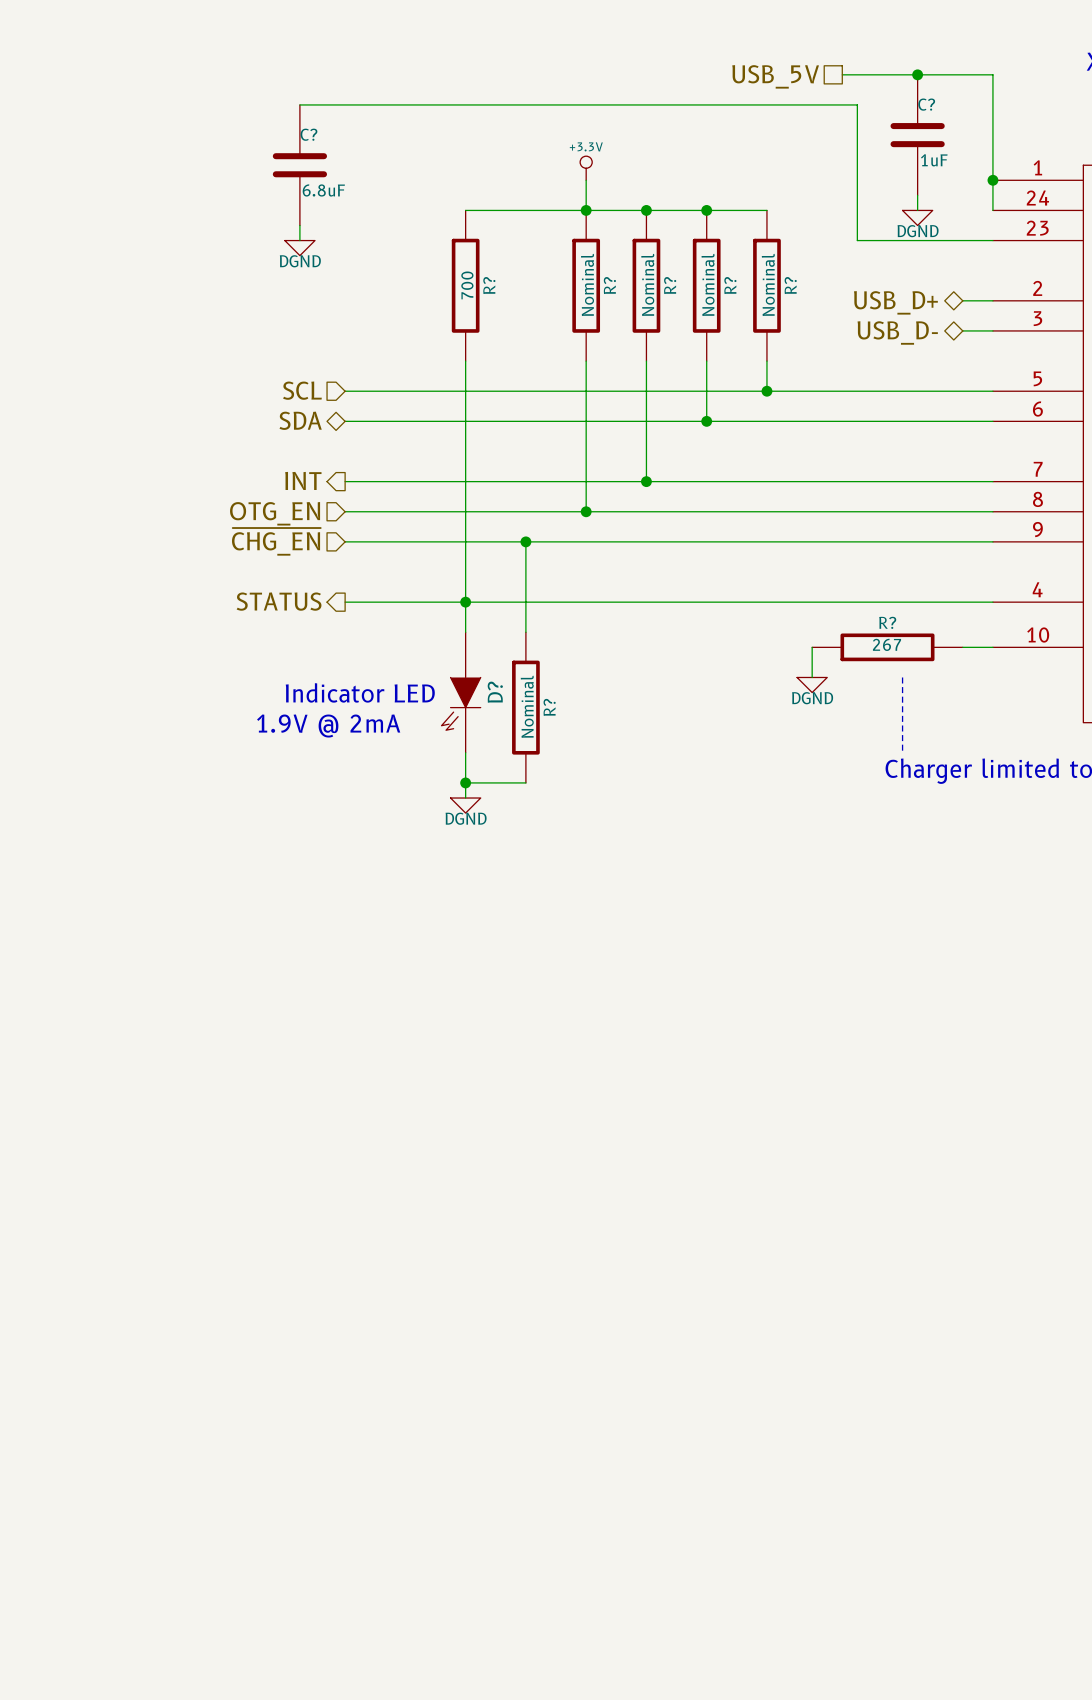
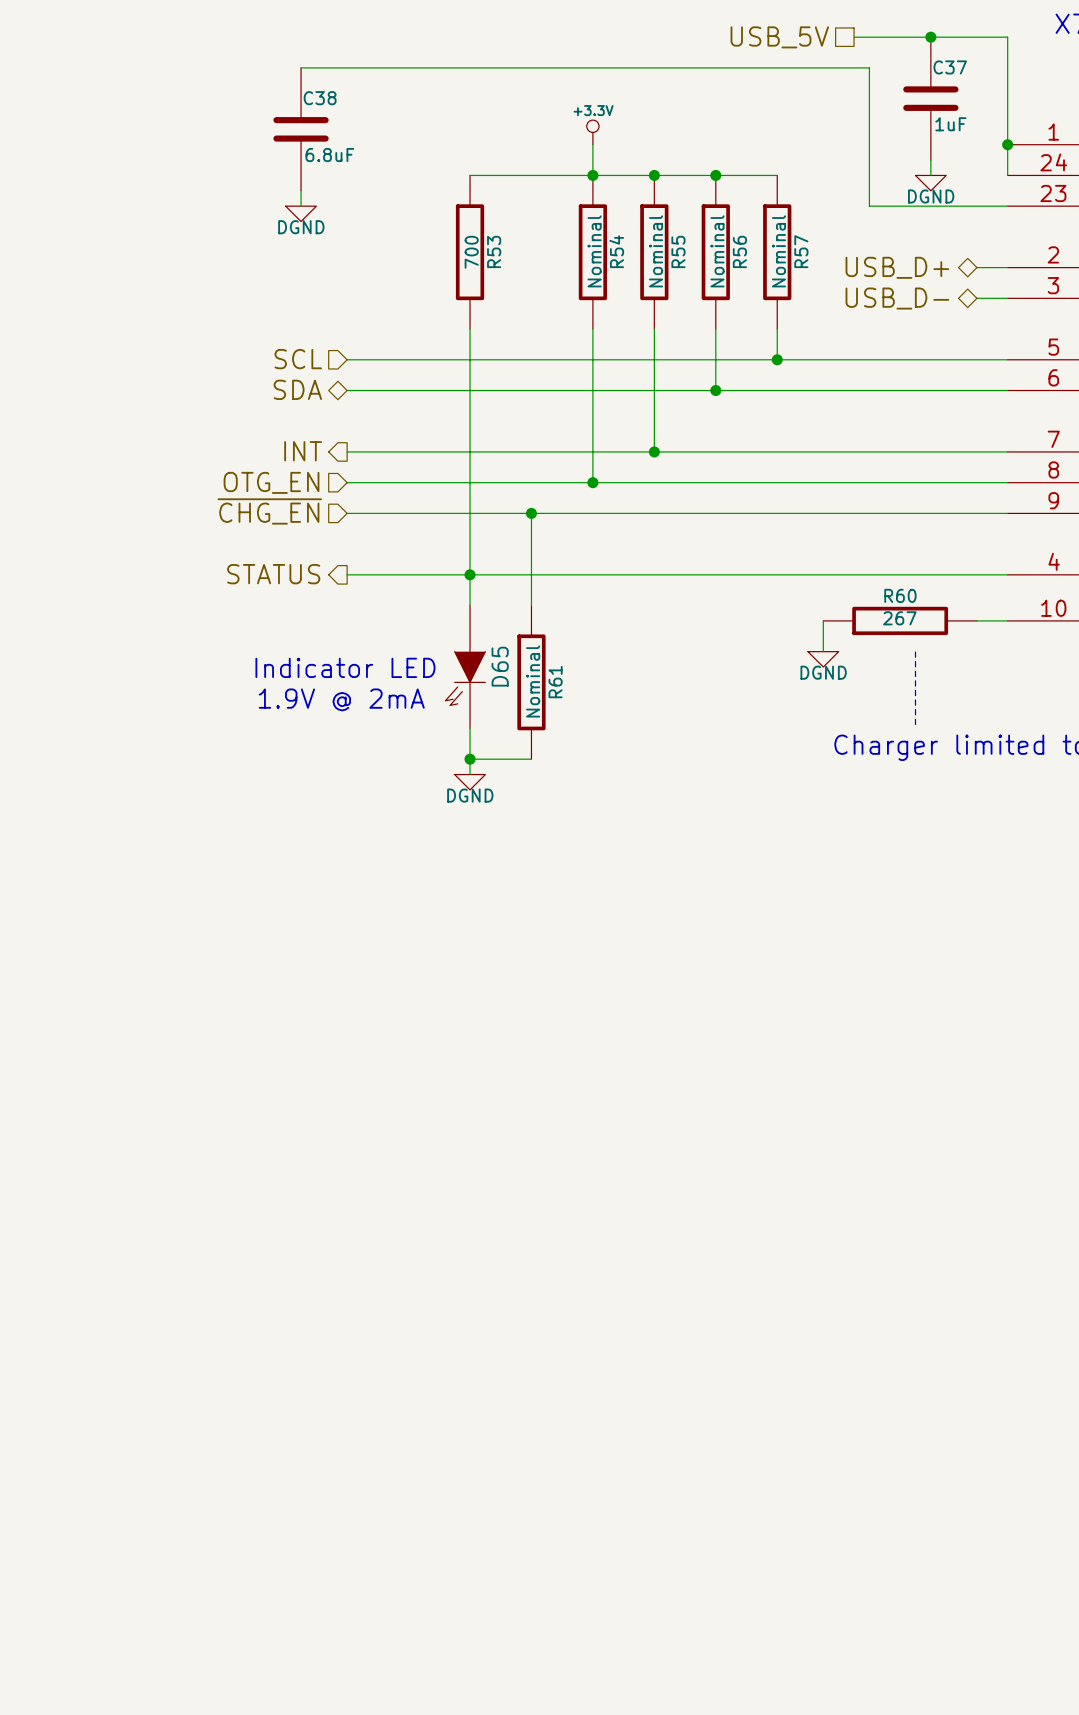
C? name: C? (926, 104) -> C37 (950, 67)
C? name: C? (308, 134) -> C38 (320, 98)
R? name: R? (489, 285) -> R53 (494, 251)
R? name: R? (609, 285) -> R54 (616, 251)
R? name: R? (670, 285) -> R55 (678, 251)
R? name: R? (730, 285) -> R56 (739, 251)
R? name: R? (790, 285) -> R57 (801, 251)
R? name: R? (887, 622) -> R60 (900, 595)
D? name: D? (495, 692) -> D65 (500, 666)
R? name: R? (549, 707) -> R61 (555, 682)

